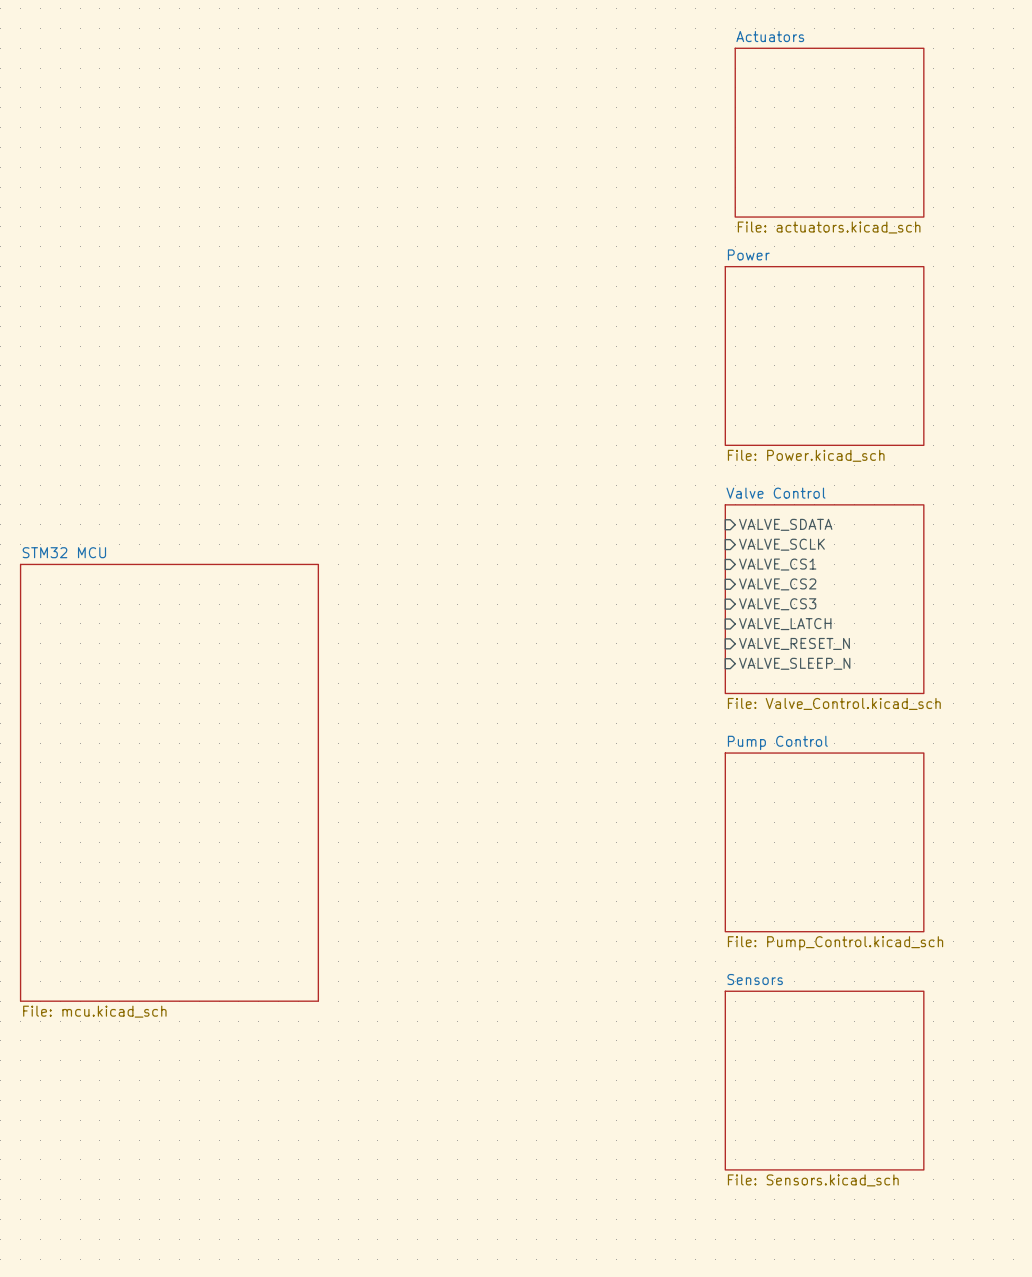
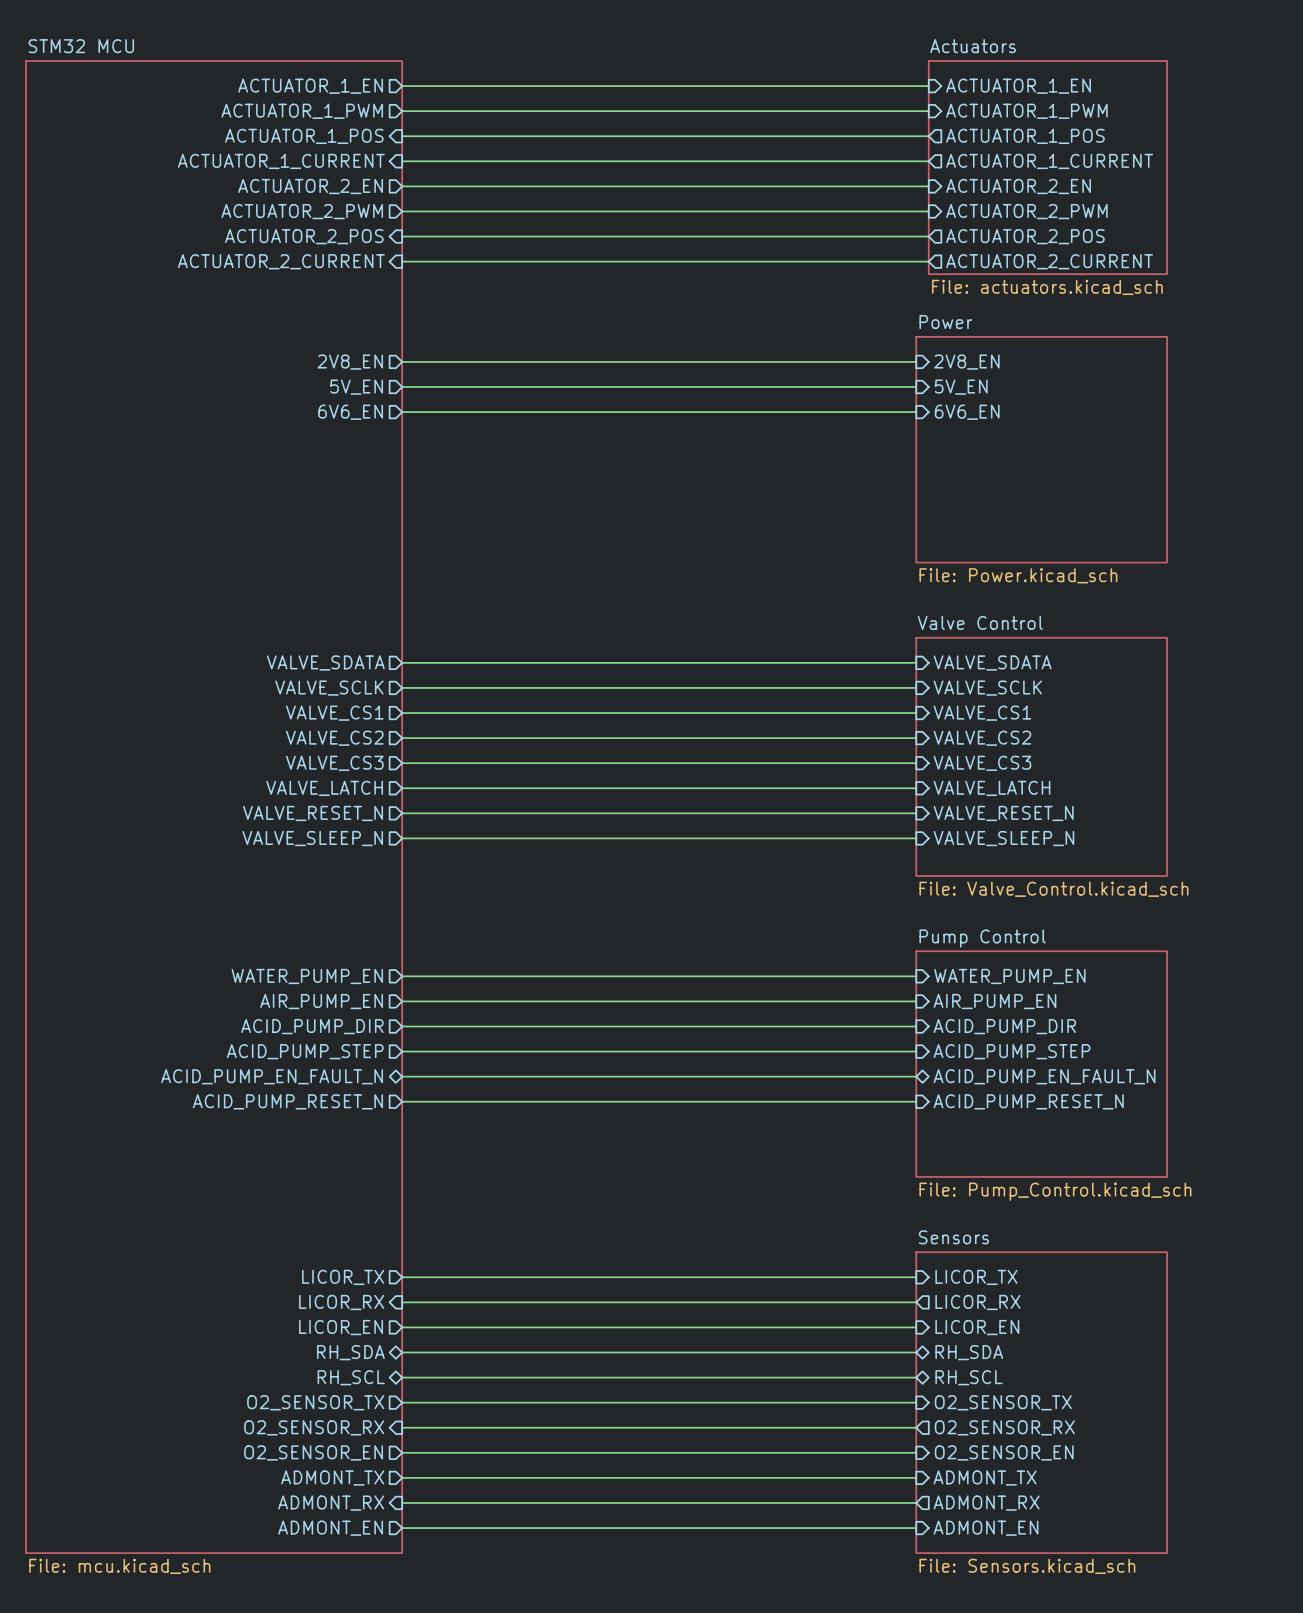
sheet pin: none -> ACTUATOR_1_EN (310, 86)
wire: none -> (402, 86) (928, 86)
sheet pin: none -> ACTUATOR_1_EN (1018, 86)
wire: none -> (402, 111) (928, 111)
sheet pin: none -> ACTUATOR_1_PWM (302, 111)
sheet pin: none -> ACTUATOR_1_PWM (1026, 111)
sheet pin: none -> ACTUATOR_1_POS (304, 136)
wire: none -> (402, 136) (928, 136)
sheet pin: none -> ACTUATOR_1_POS (1025, 136)
sheet pin: none -> ACTUATOR_1_CURRENT (281, 161)
wire: none -> (402, 161) (928, 161)
sheet pin: none -> ACTUATOR_1_CURRENT (1049, 161)
sheet pin: none -> ACTUATOR_2_EN (310, 186)
wire: none -> (402, 186) (928, 186)
sheet pin: none -> ACTUATOR_2_EN (1018, 186)
sheet pin: none -> ACTUATOR_2_PWM (302, 211)
wire: none -> (402, 211) (928, 211)
sheet pin: none -> ACTUATOR_2_PWM (1026, 211)
sheet pin: none -> ACTUATOR_2_POS (304, 236)
wire: none -> (402, 236) (928, 236)
sheet pin: none -> ACTUATOR_2_POS (1025, 236)
sheet pin: none -> ACTUATOR_2_CURRENT (281, 261)
wire: none -> (402, 261) (928, 261)
sheet pin: none -> ACTUATOR_2_CURRENT (1049, 261)
sheet pin: none -> 2V8_EN (350, 362)
wire: none -> (402, 361) (916, 361)
sheet pin: none -> 2V8_EN (966, 362)
sheet pin: none -> 5V_EN (356, 387)
wire: none -> (402, 387) (916, 387)
sheet pin: none -> 5V_EN (961, 387)
sheet pin: none -> 6V6_EN (350, 412)
wire: none -> (402, 412) (916, 412)
sheet pin: none -> 6V6_EN (967, 412)
sheet pin: none -> VALVE_SDATA (325, 662)
wire: none -> (402, 662) (916, 662)
sheet pin: none -> VALVE_SCLK (329, 688)
wire: none -> (402, 687) (916, 687)
sheet STM32 MCU name position: STM32 MCU (64, 552) -> STM32 MCU (81, 46)
sheet STM32 MCU shape: [19, 563, 319, 1002] -> [25, 60, 403, 1554]
sheet pin: none -> VALVE_CS1 (334, 713)
wire: none -> (402, 713) (916, 713)
sheet pin: none -> VALVE_CS2 (334, 738)
wire: none -> (402, 738) (916, 738)
sheet pin: none -> VALVE_CS3 (334, 763)
wire: none -> (402, 763) (916, 763)
wire: none -> (402, 788) (916, 788)
sheet pin: none -> VALVE_LATCH (324, 788)
sheet pin: none -> VALVE_RESET_N (312, 813)
wire: none -> (402, 813) (916, 813)
sheet pin: none -> VALVE_SLEEP_N (312, 838)
wire: none -> (402, 838) (916, 838)
sheet pin: none -> WATER_PUMP_EN (307, 976)
wire: none -> (402, 976) (916, 976)
sheet pin: none -> WATER_PUMP_EN (1009, 976)
sheet pin: none -> AIR_PUMP_EN (321, 1001)
wire: none -> (402, 1001) (916, 1001)
sheet pin: none -> AIR_PUMP_EN (994, 1001)
sheet pin: none -> ACID_PUMP_DIR (312, 1026)
wire: none -> (402, 1026) (916, 1026)
sheet pin: none -> ACID_PUMP_DIR (1004, 1026)
sheet pin: none -> ACID_PUMP_STEP (305, 1051)
wire: none -> (402, 1051) (916, 1051)
sheet pin: none -> ACID_PUMP_STEP (1011, 1051)
sheet pin: none -> ACID_PUMP_EN_FAULT_N (272, 1076)
wire: none -> (402, 1076) (916, 1076)
sheet pin: none -> ACID_PUMP_EN_FAULT_N (1044, 1076)
sheet pin: none -> ACID_PUMP_RESET_N (287, 1101)
wire: none -> (402, 1101) (916, 1101)
sheet pin: none -> ACID_PUMP_RESET_N (1028, 1101)
sheet STM32 MCU value position: File: mcu.kicad_sch (94, 1011) -> File: mcu.kicad_sch (119, 1566)
sheet pin: none -> LICOR_TX (343, 1277)
wire: none -> (402, 1277) (916, 1277)
sheet pin: none -> LICOR_TX (976, 1277)
wire: none -> (402, 1302) (916, 1302)
sheet pin: none -> LICOR_RX (341, 1302)
sheet pin: none -> LICOR_RX (977, 1302)
sheet pin: none -> LICOR_EN (341, 1327)
wire: none -> (402, 1327) (916, 1327)
sheet pin: none -> LICOR_EN (977, 1327)
sheet pin: none -> RH_SDA (350, 1352)
wire: none -> (402, 1352) (916, 1352)
sheet pin: none -> RH_SDA (969, 1352)
sheet Sensors: File: Sensors.kicad_sch (824, 1080) -> none
sheet pin: none -> RH_SCL (351, 1377)
wire: none -> (402, 1377) (916, 1377)
sheet pin: none -> RH_SCL (968, 1377)
sheet pin: none -> O2_SENSOR_TX (315, 1402)
wire: none -> (402, 1402) (916, 1402)
sheet pin: none -> O2_SENSOR_TX (1003, 1402)
sheet Sensors: none -> File: Sensors.kicad_sch (1041, 1402)
sheet pin: none -> O2_SENSOR_RX (314, 1427)
wire: none -> (402, 1427) (916, 1427)
sheet pin: none -> O2_SENSOR_RX (1004, 1427)
sheet pin: none -> O2_SENSOR_EN (313, 1452)
wire: none -> (402, 1452) (916, 1452)
sheet pin: none -> O2_SENSOR_EN (1004, 1452)
wire: none -> (402, 1477) (916, 1477)
sheet pin: none -> ADMONT_TX (332, 1478)
sheet pin: none -> ADMONT_TX (985, 1478)
sheet pin: none -> ADMONT_RX (331, 1503)
wire: none -> (402, 1502) (916, 1502)
sheet pin: none -> ADMONT_RX (986, 1503)
sheet pin: none -> ADMONT_EN (330, 1528)
wire: none -> (402, 1528) (916, 1528)
sheet pin: none -> ADMONT_EN (986, 1528)

